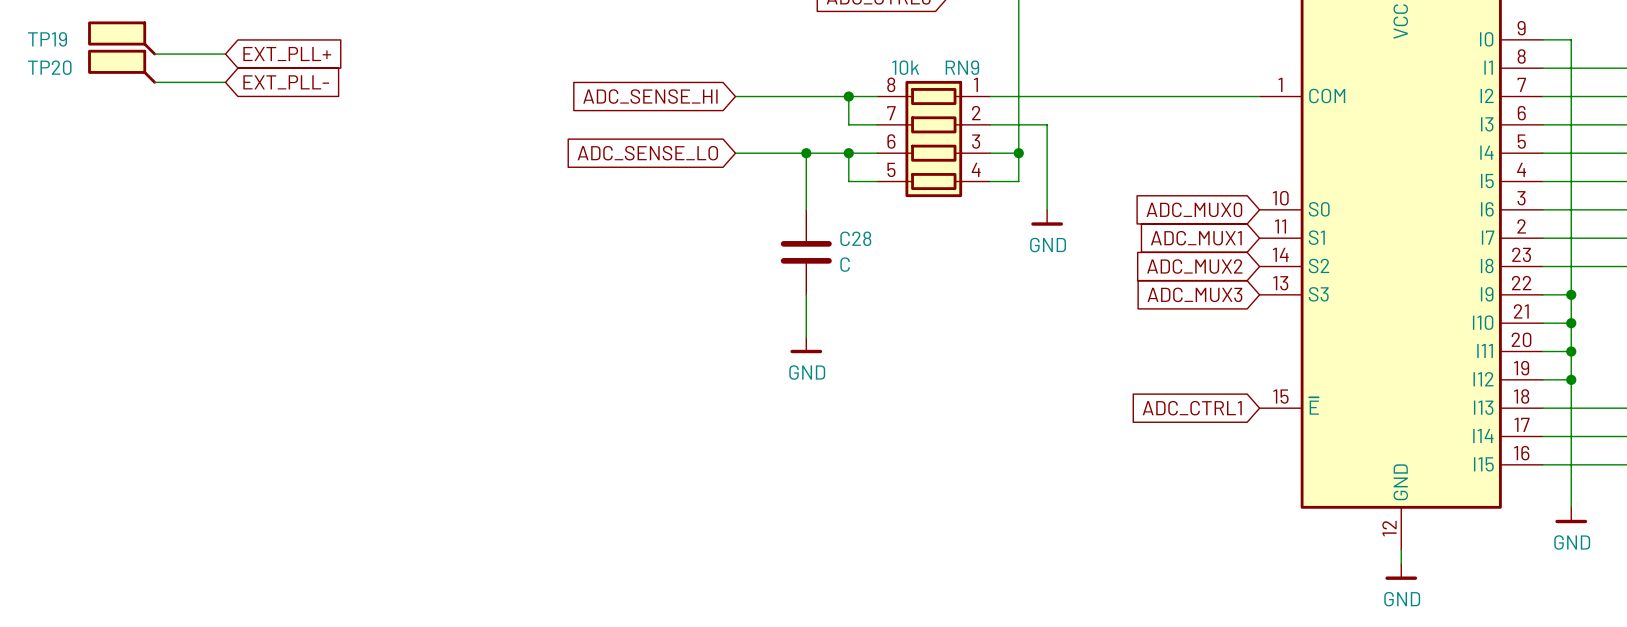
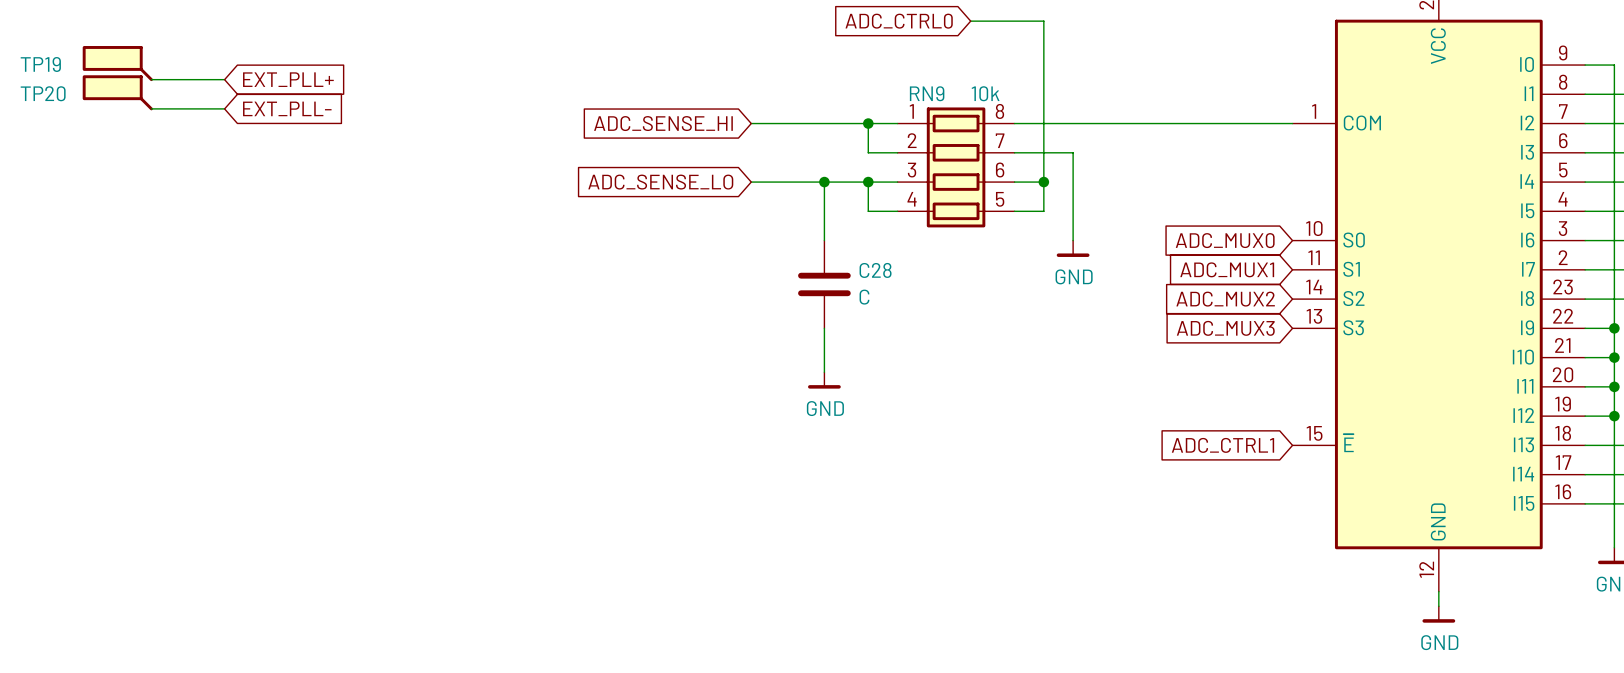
RN9 flip: as is (933, 139) -> left-right (956, 167)

